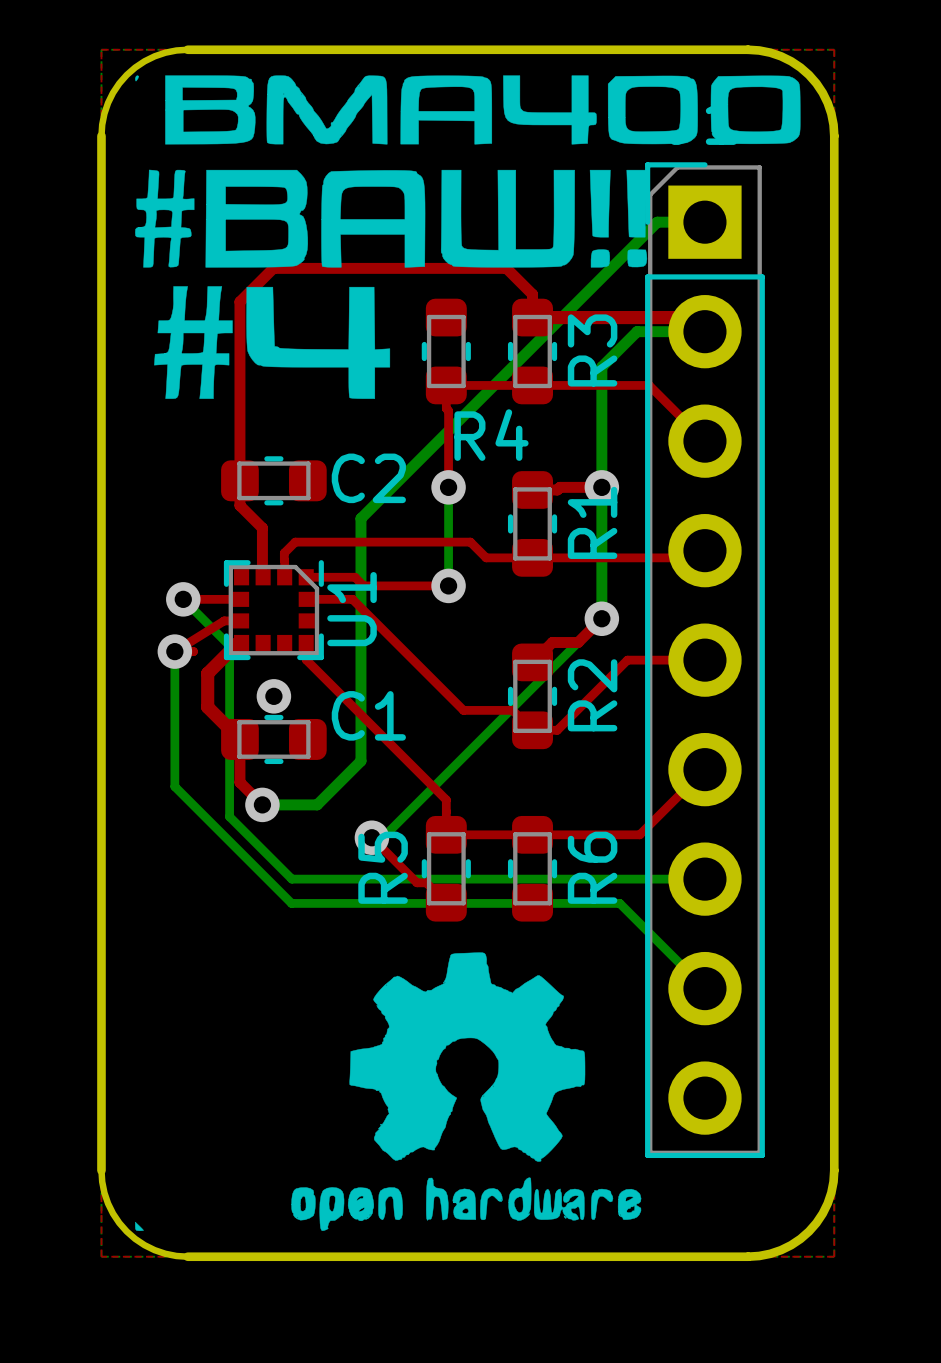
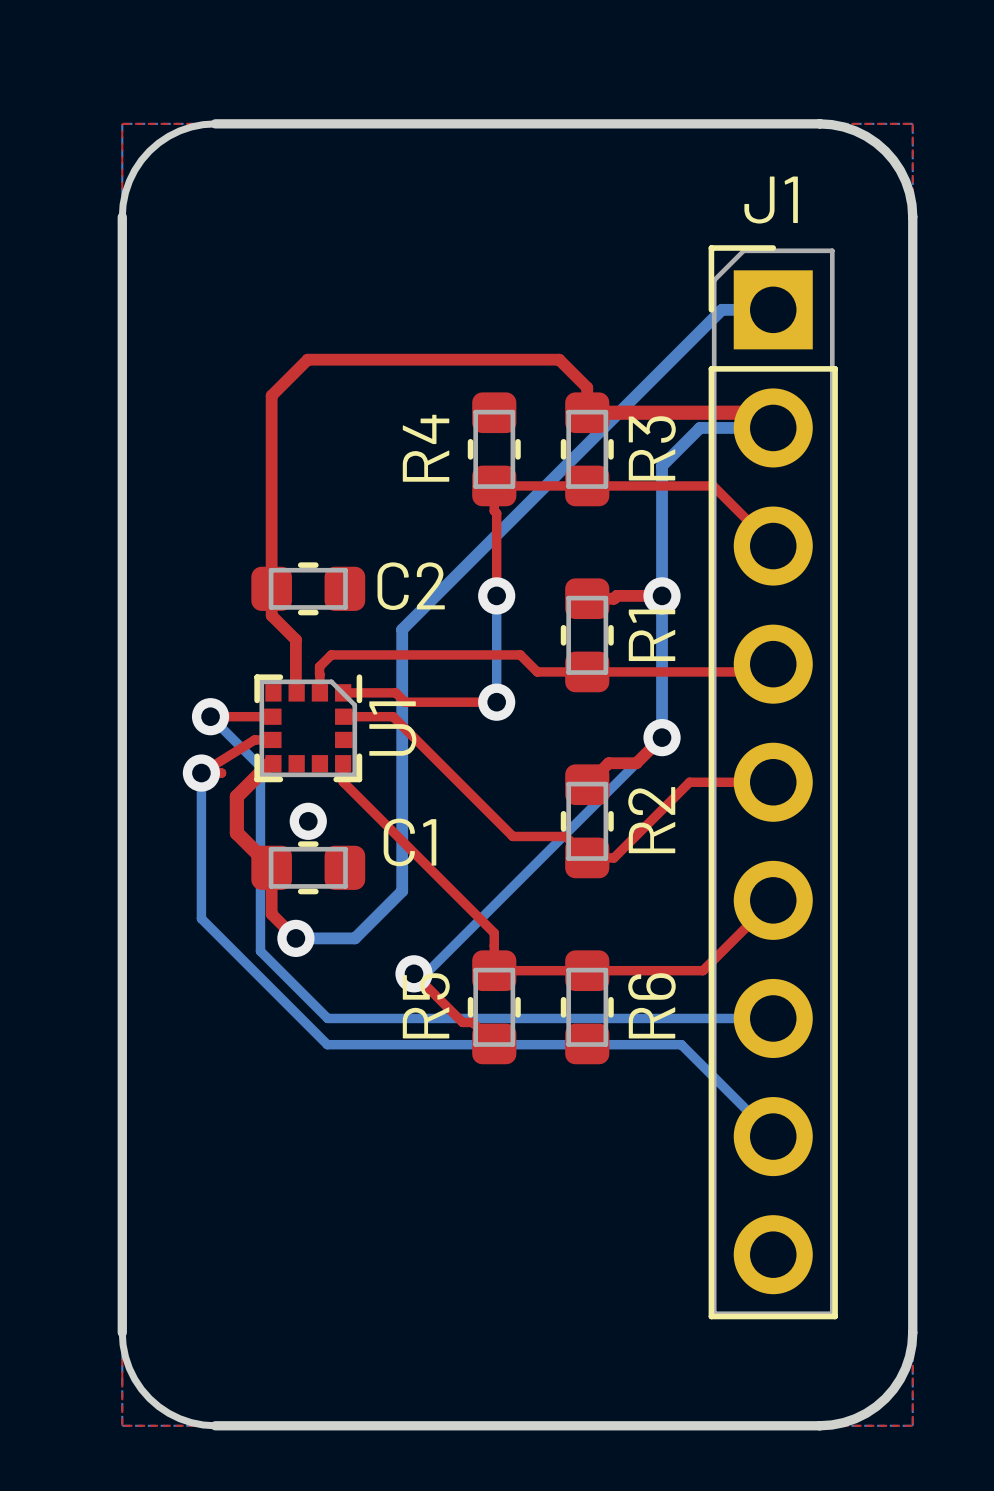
drawing: [135, 75, 801, 1232] -> none
R4 name rotation: 0° (491, 435) -> 90° counterclockwise (426, 448)
R4 name position: R4 (491, 435) -> R4 (426, 448)

